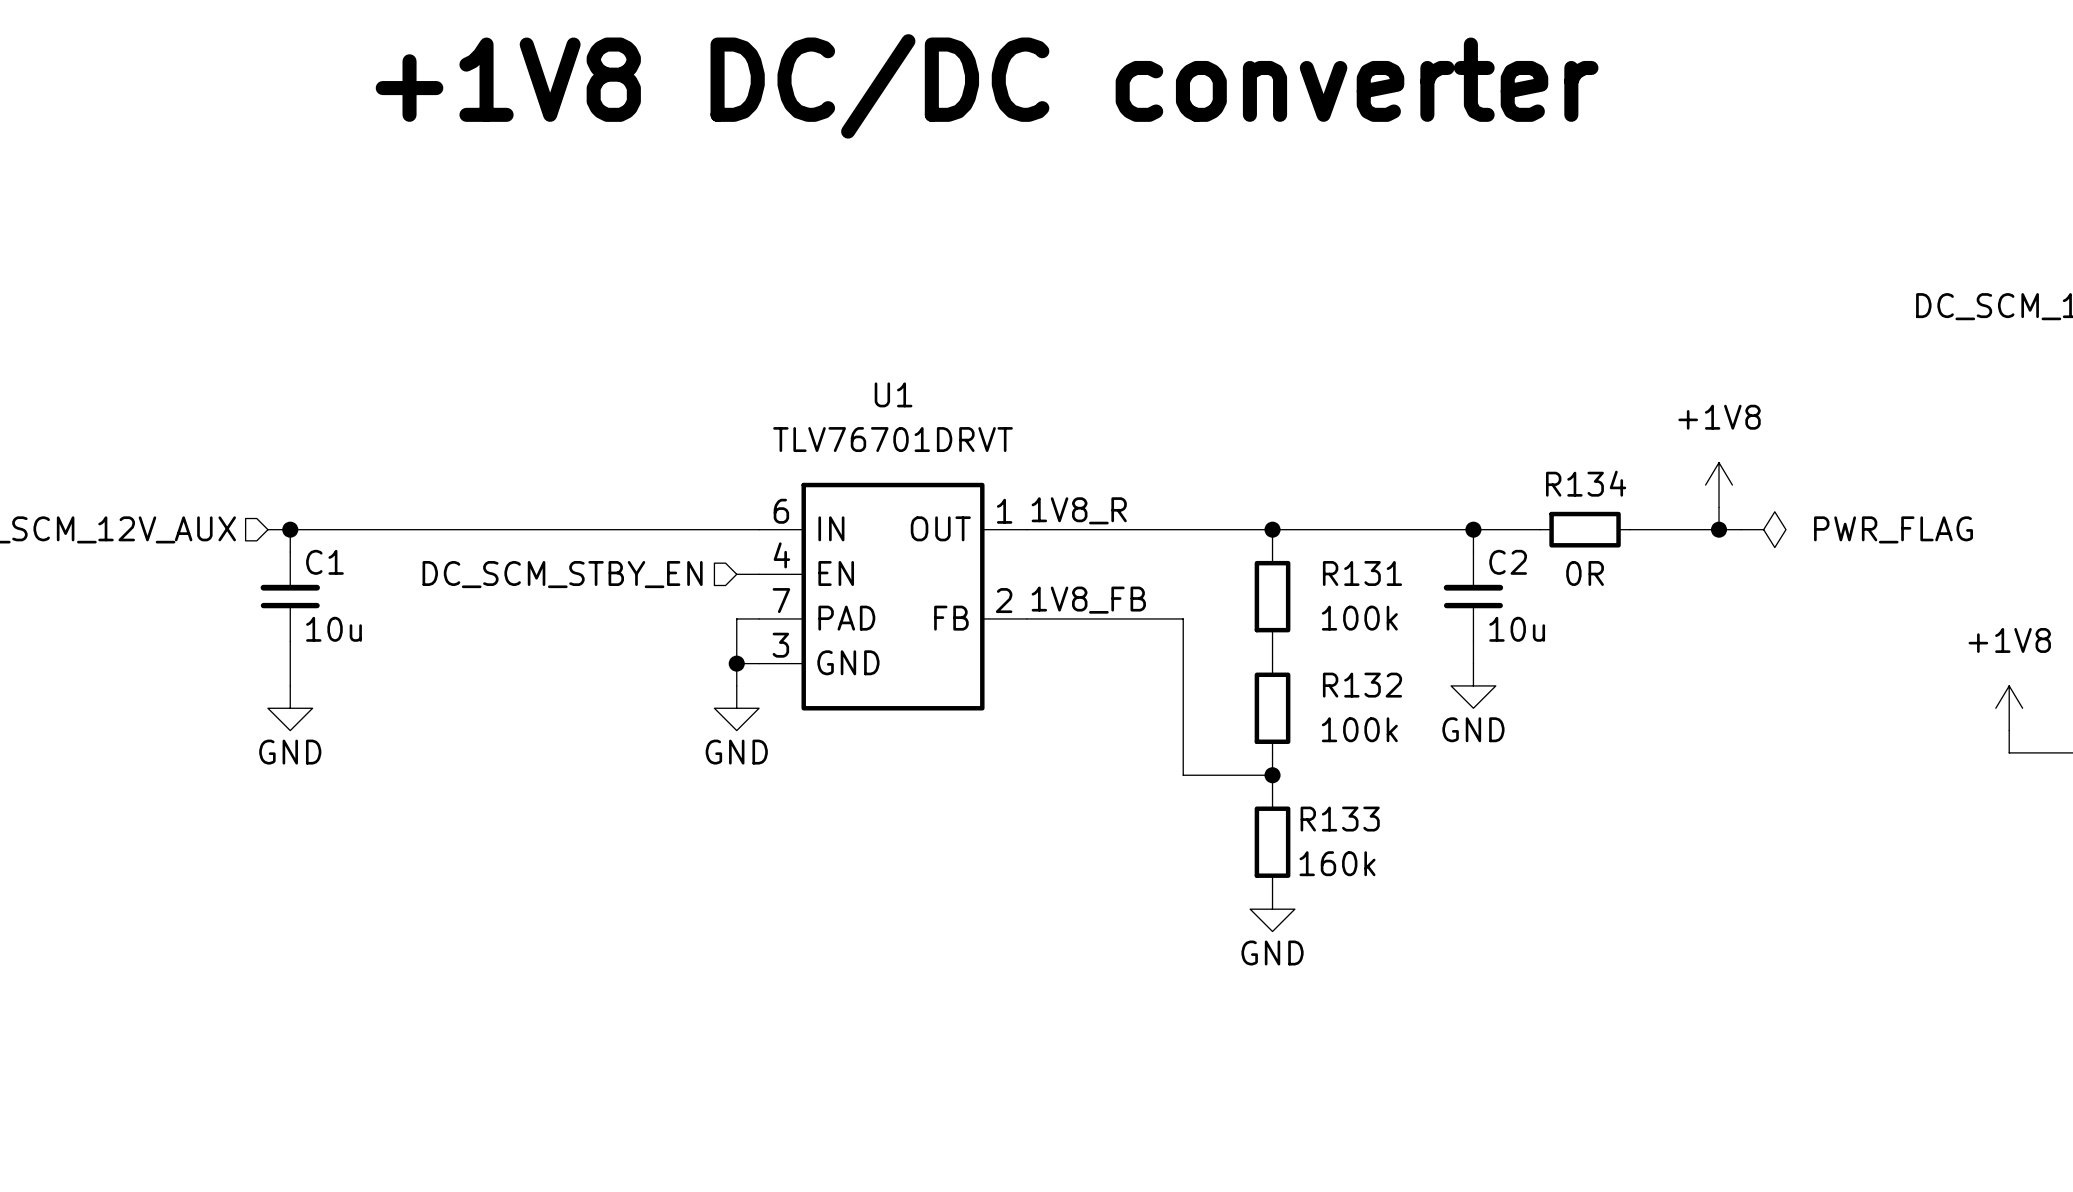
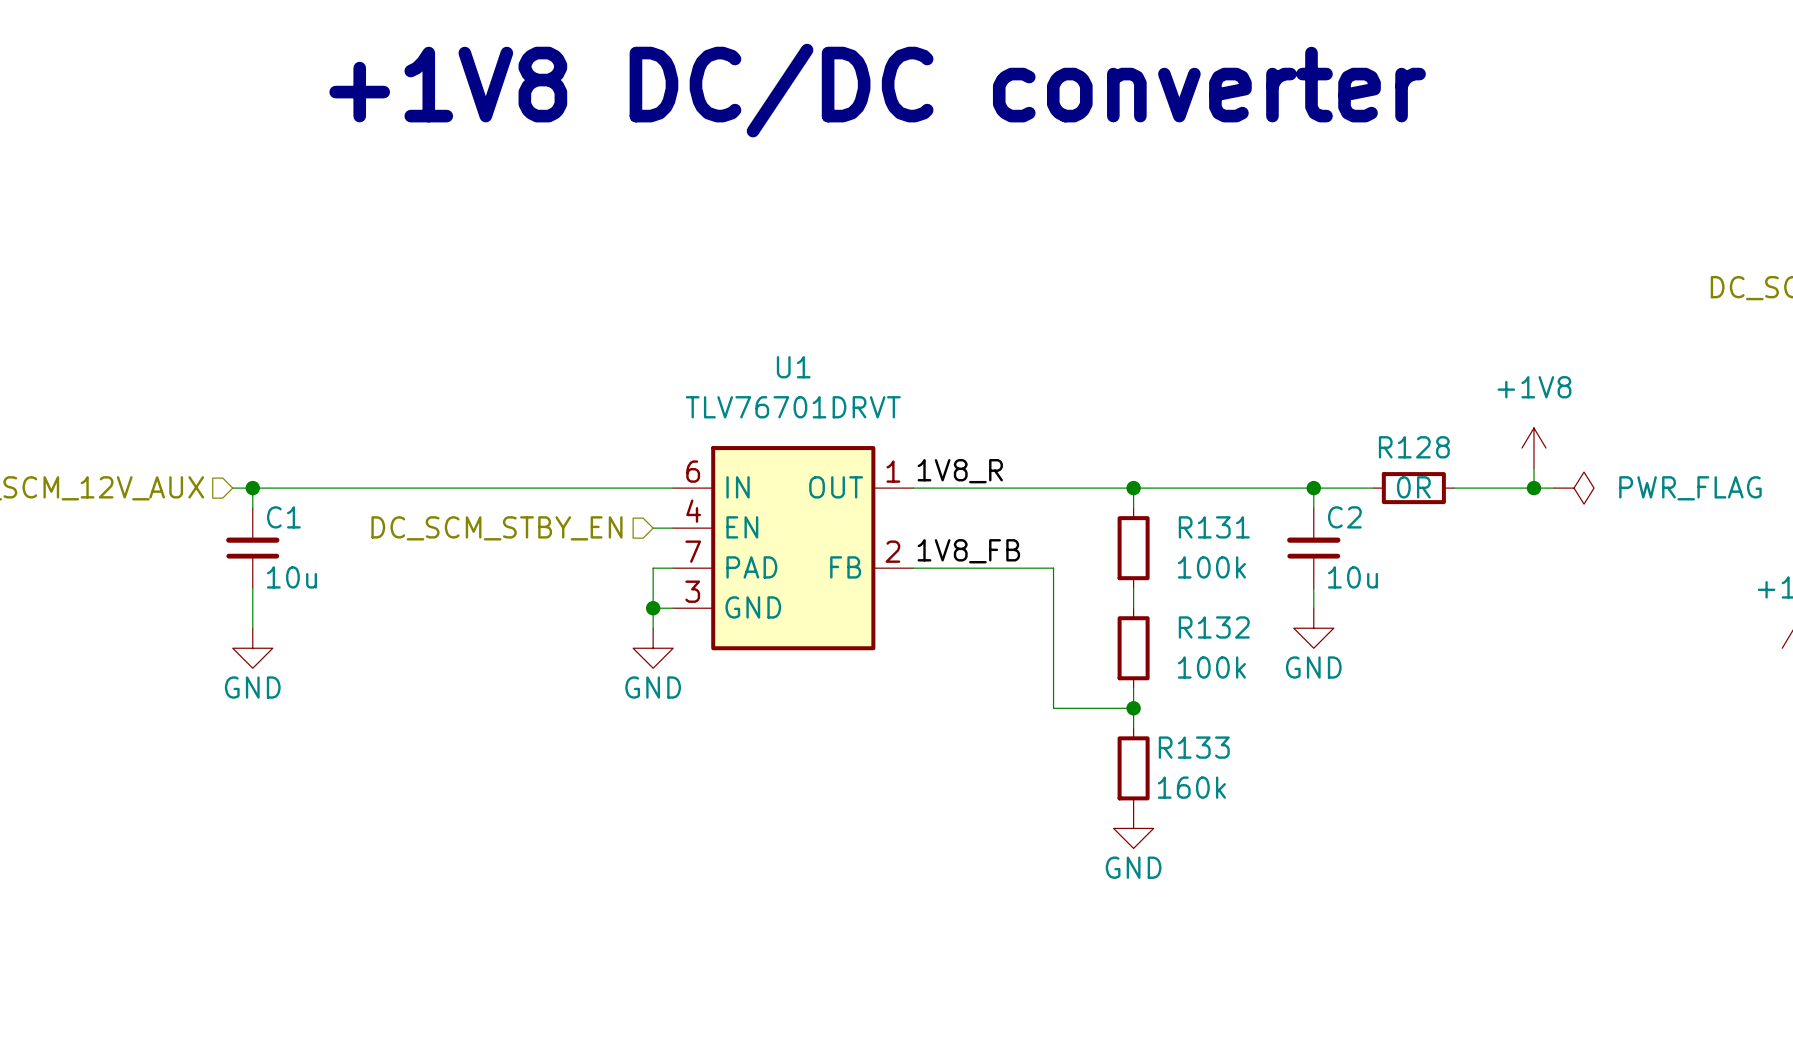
R134 name: R134 (1586, 483) -> R128 (1414, 447)
R134 text position: 0R (1585, 573) -> 0R (1413, 487)

